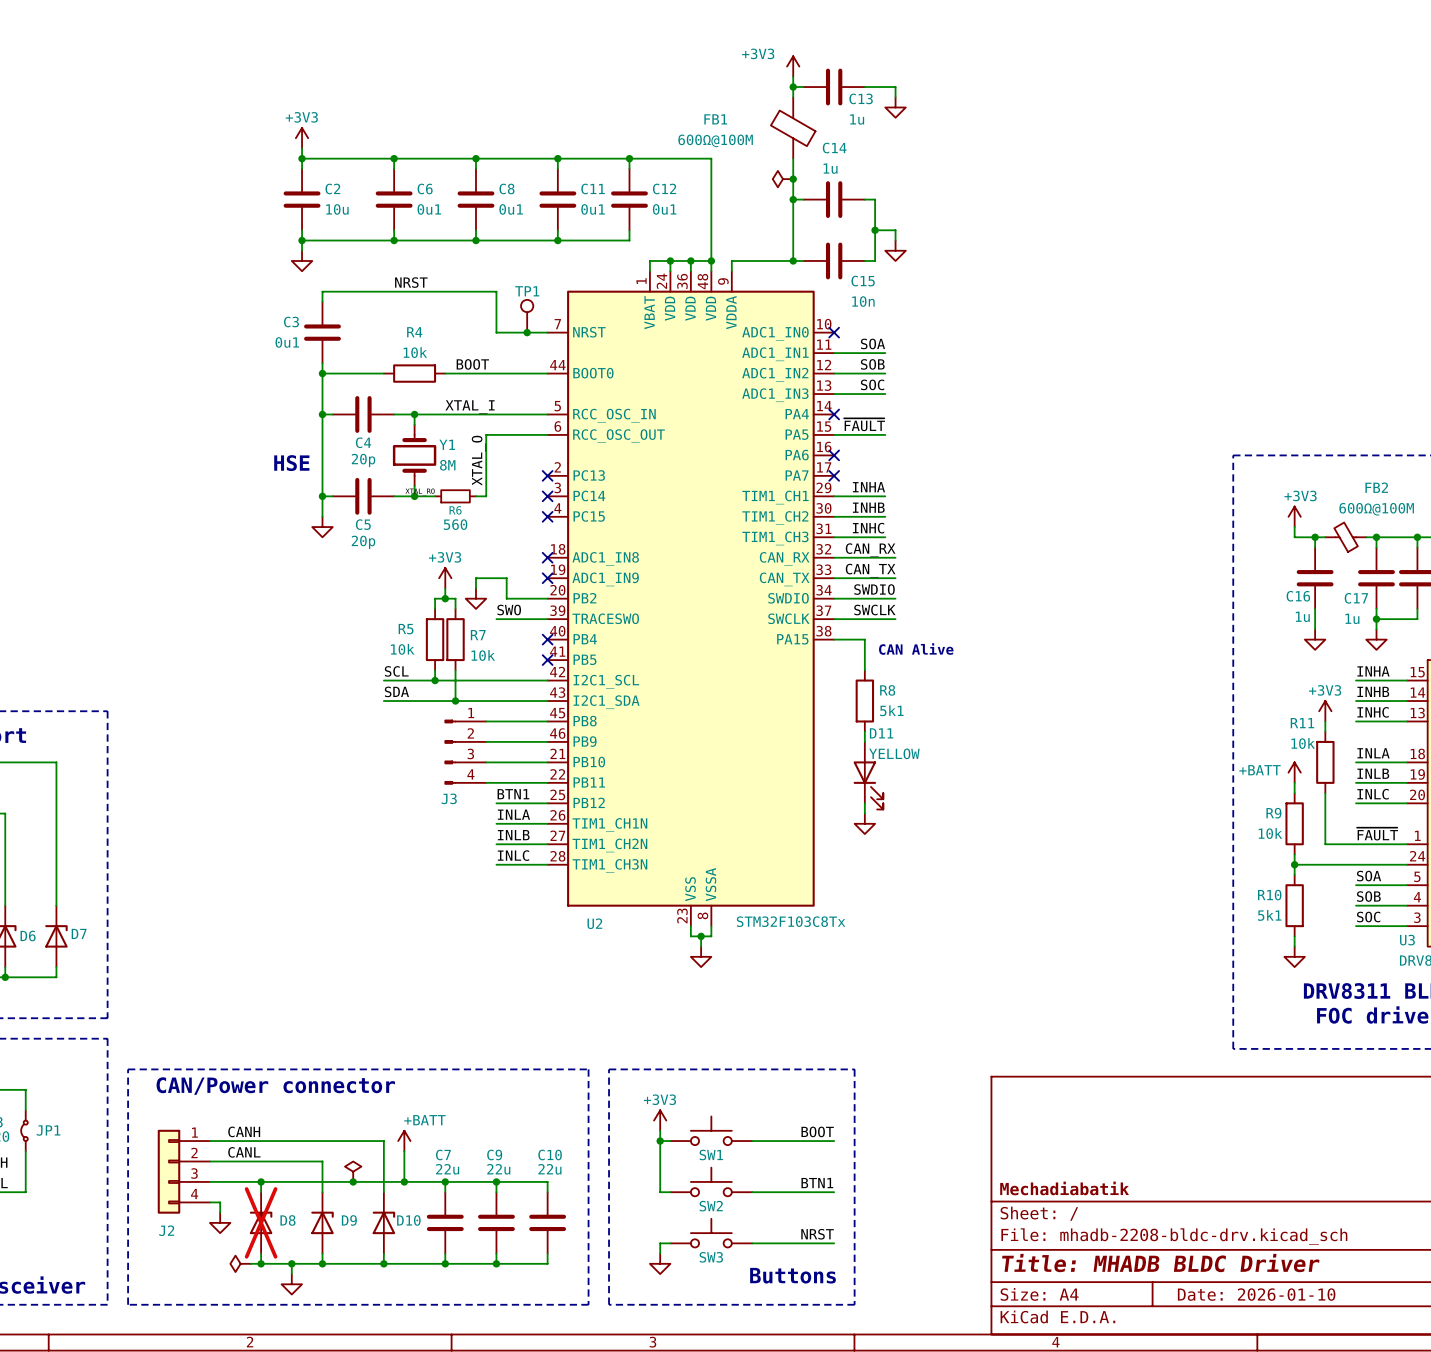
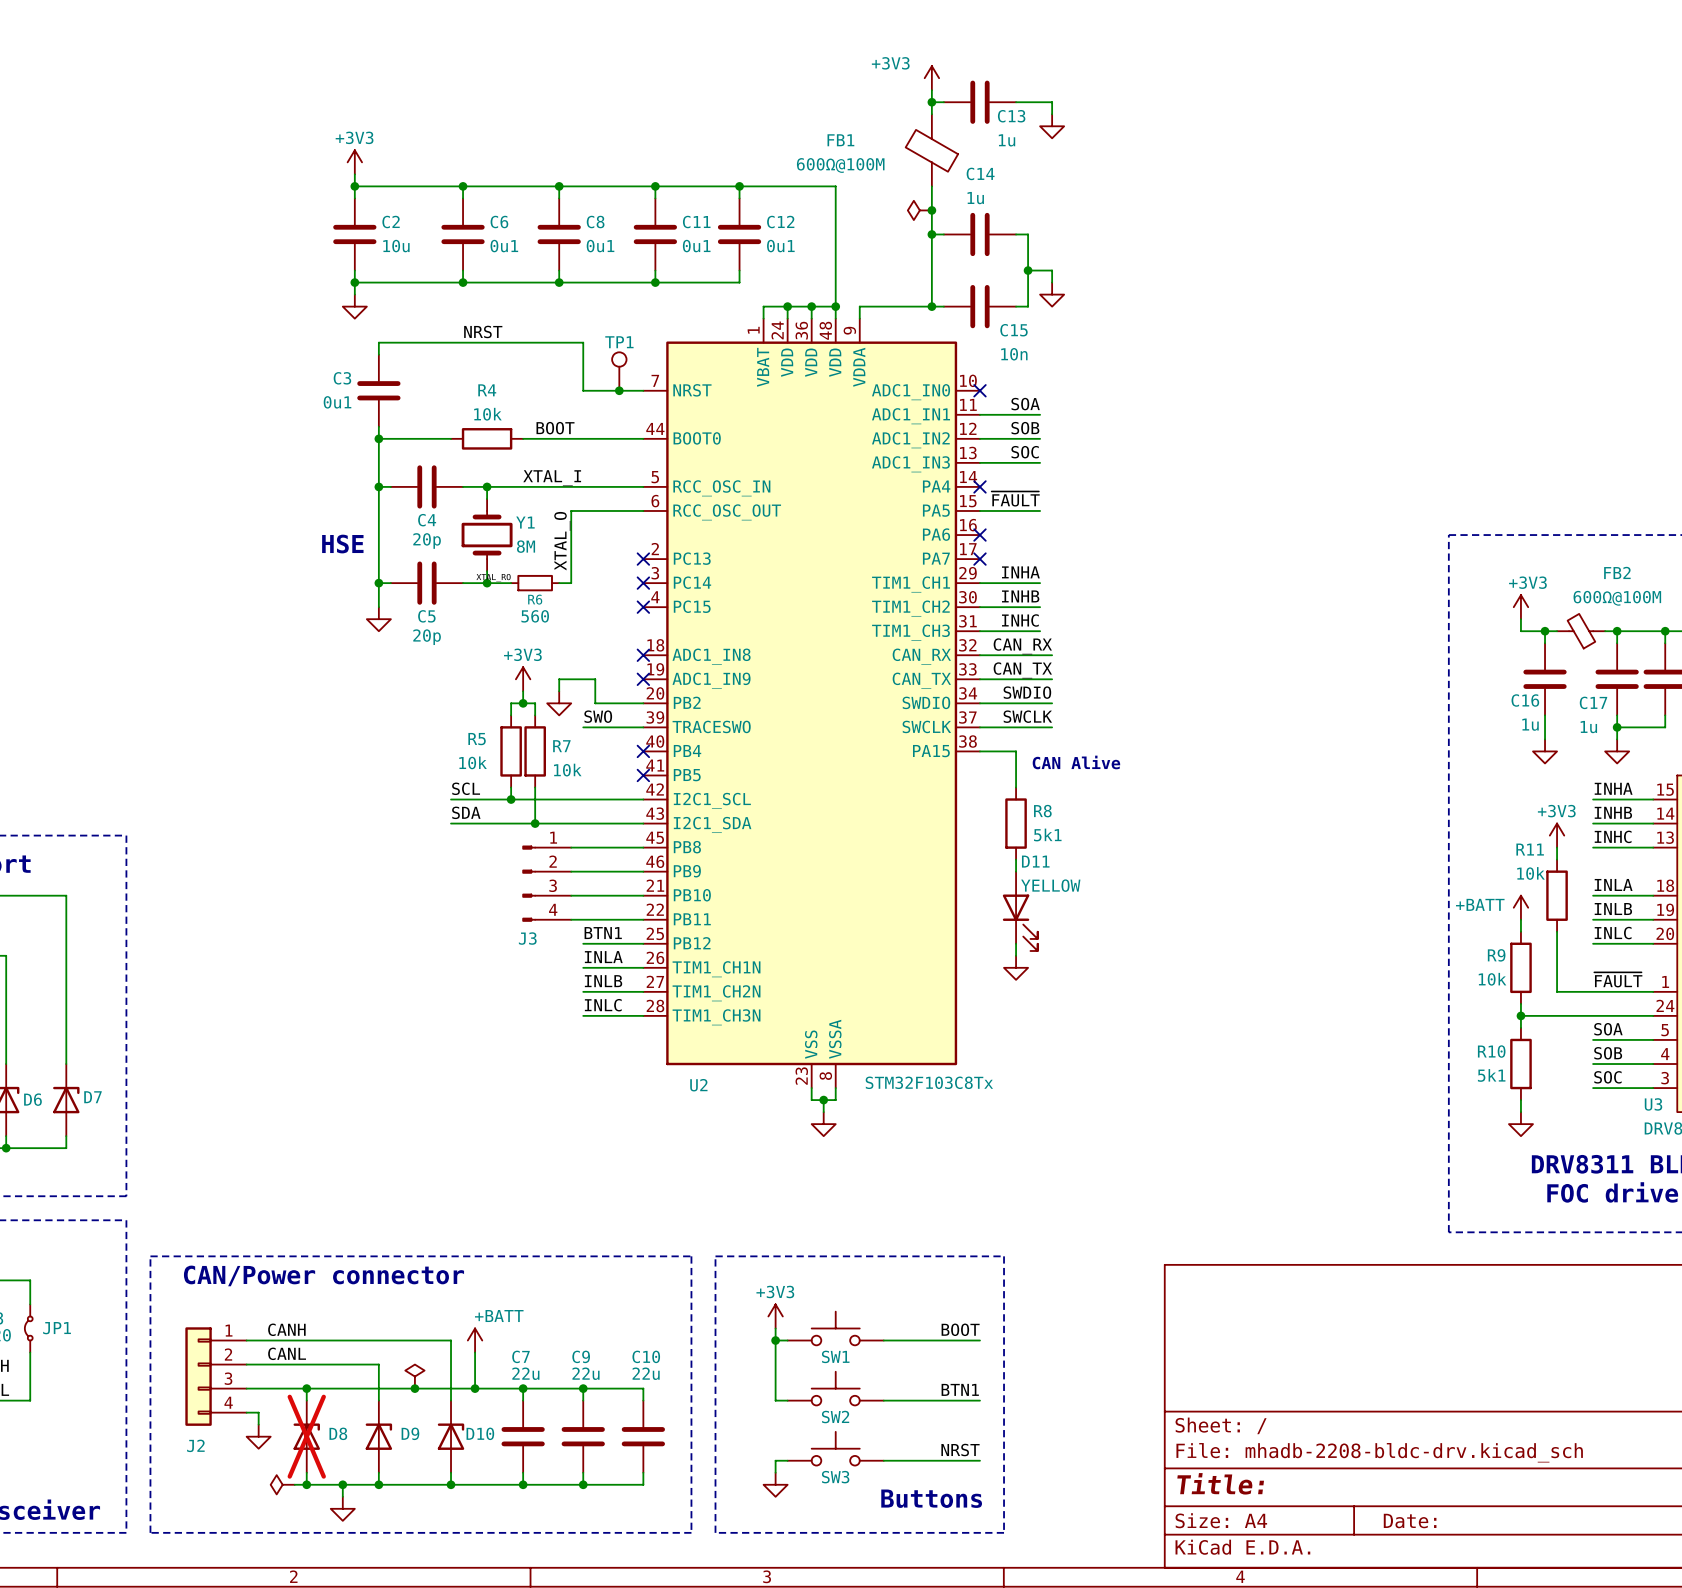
title block: Mechadiabatik (1064, 1188) -> none
title block: Title: MHADB BLDC Driver (1160, 1263) -> Title: (1220, 1483)
title block: Date: 2026-01-10 (1256, 1294) -> Date: (1410, 1521)

